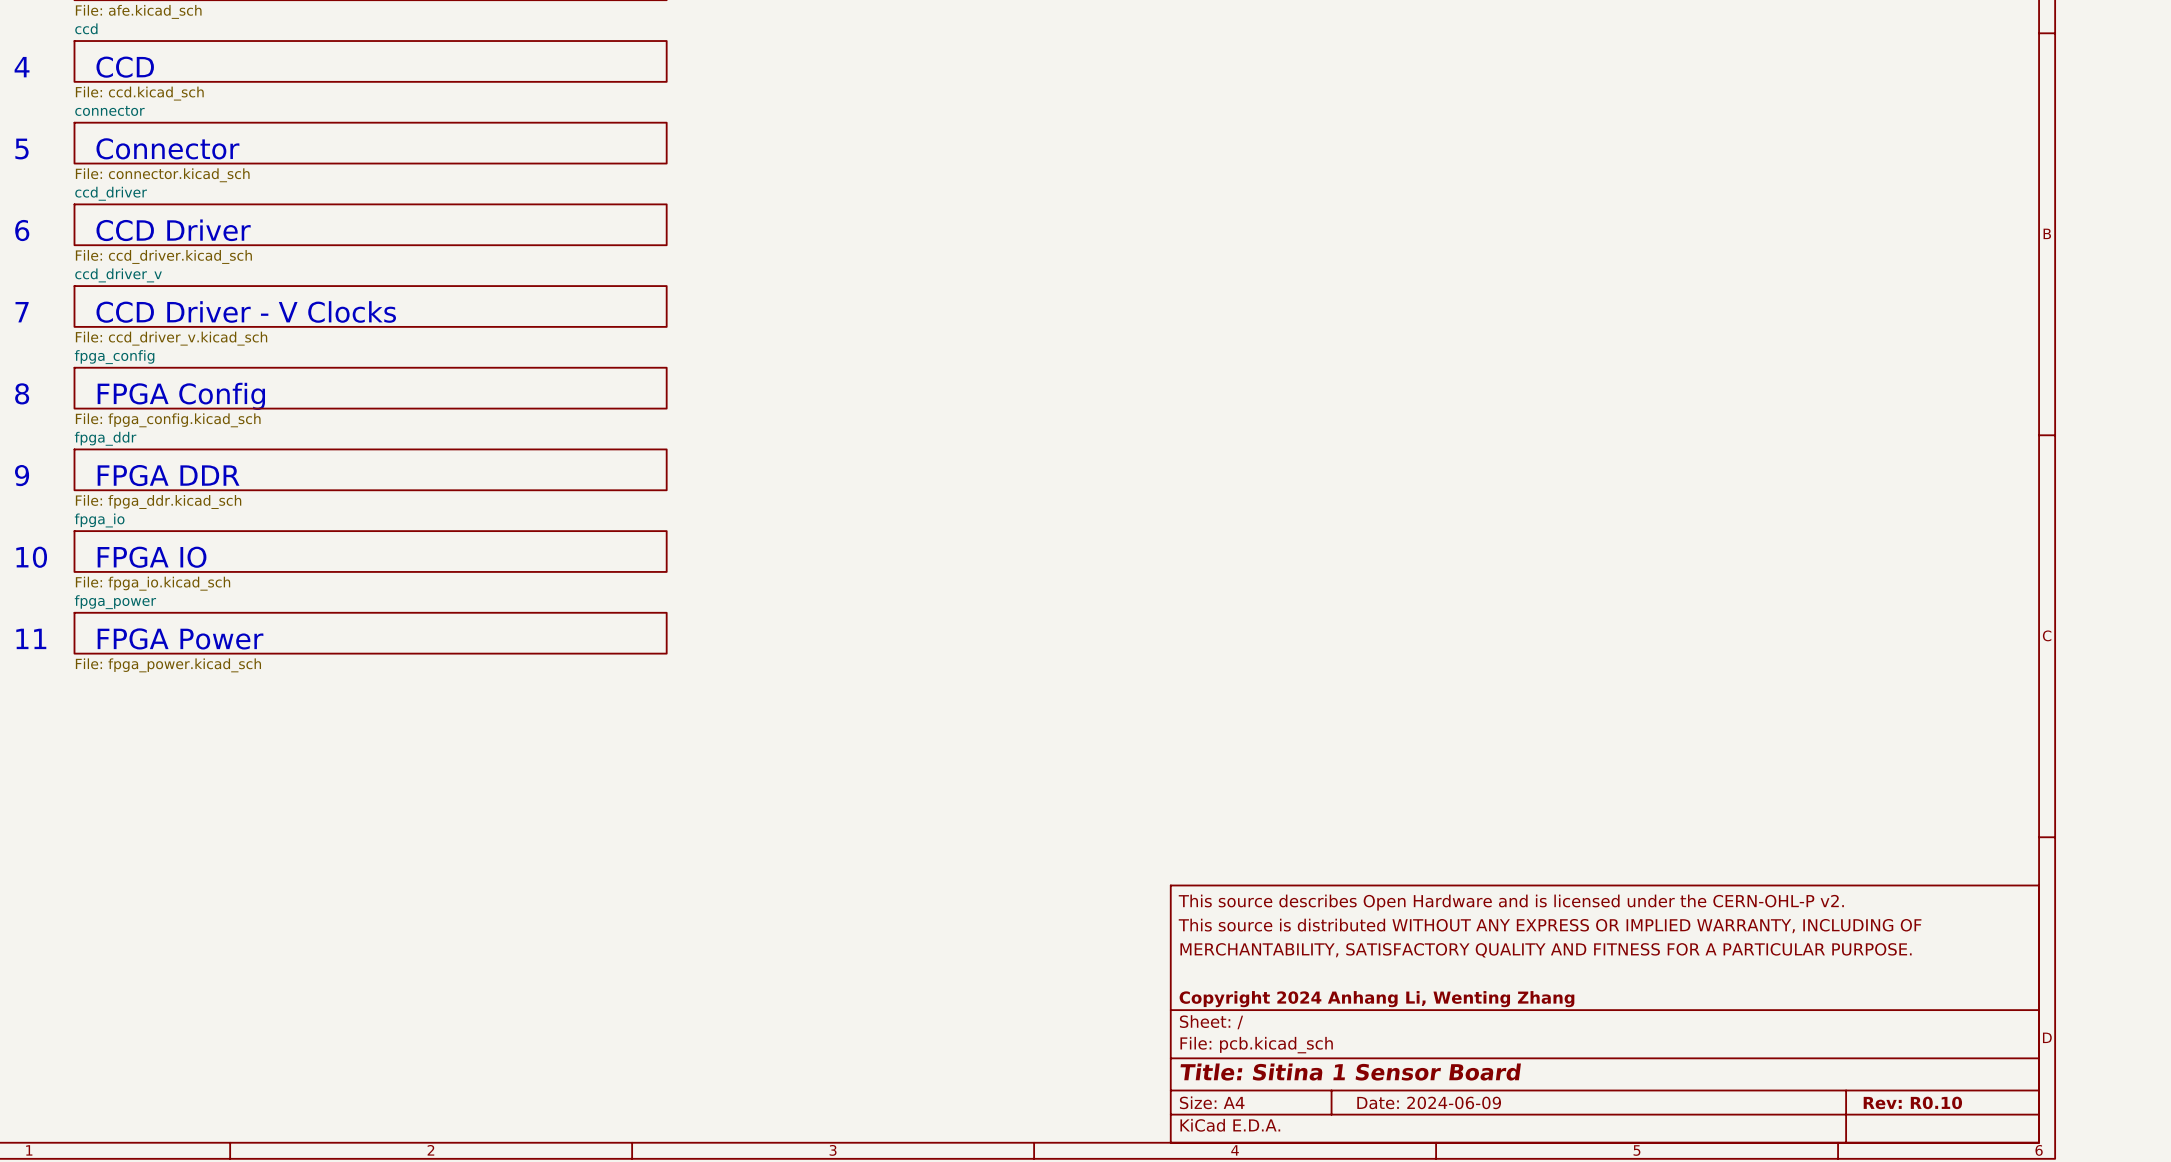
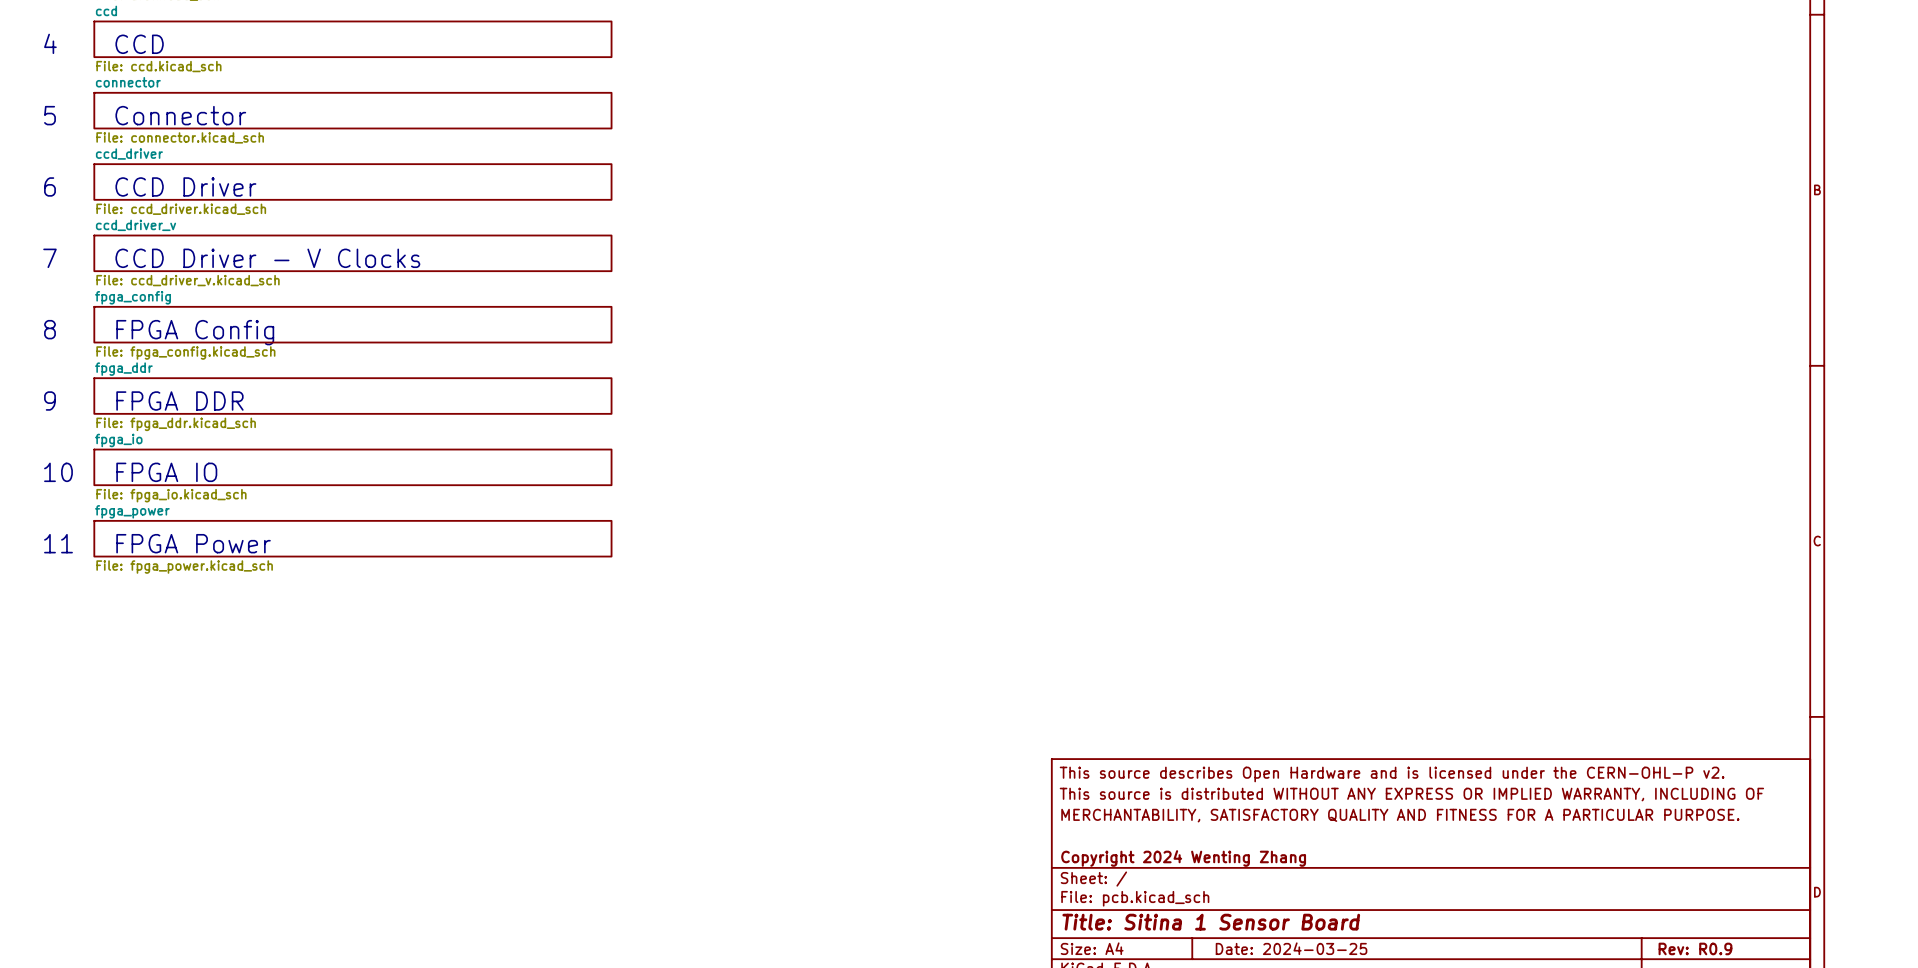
title block: Copyright 2024 Anhang Li, Wenting Zhang (1376, 999) -> Copyright 2024 Wenting Zhang (1183, 858)
title block: Date: 2024-06-09 (1429, 1102) -> Date: 2024-03-25 (1291, 948)
title block: Rev: R0.10 (1912, 1102) -> Rev: R0.9 (1695, 948)

